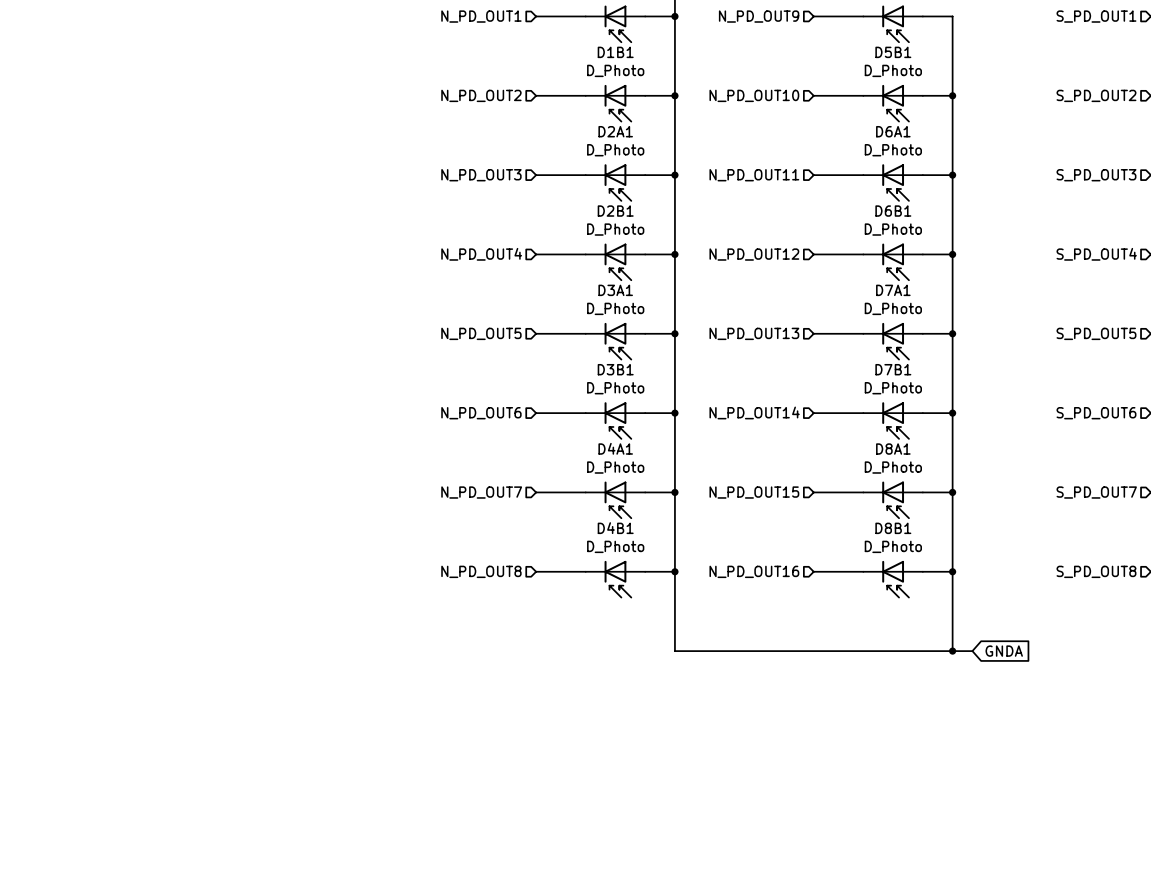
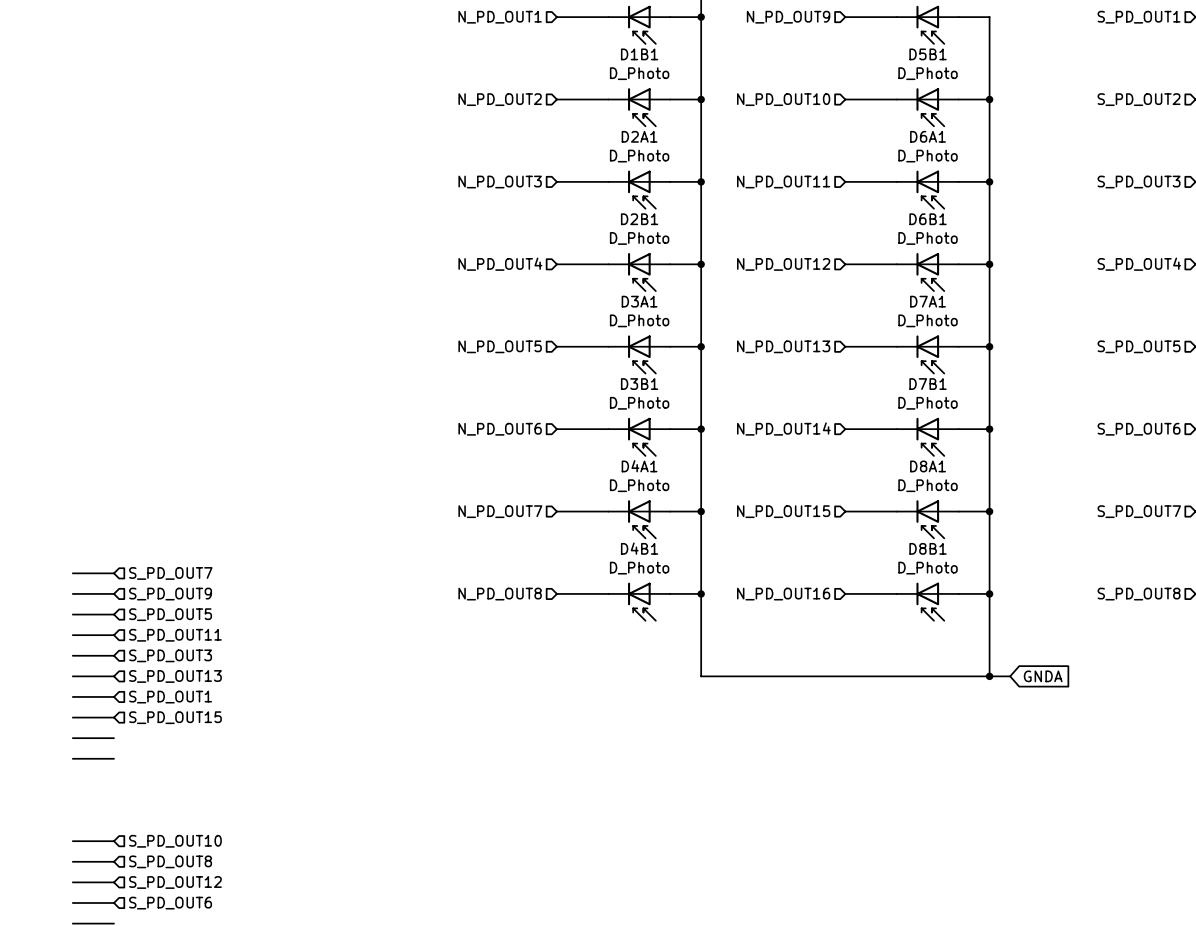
wire: none -> (72, 573) (113, 573)
hierarchical label: none -> S_PD_OUT7 (170, 573)
wire: none -> (72, 593) (113, 593)
hierarchical label: none -> S_PD_OUT9 (170, 594)
wire: none -> (72, 614) (113, 614)
hierarchical label: none -> S_PD_OUT5 (170, 614)
wire: none -> (72, 635) (113, 635)
hierarchical label: none -> S_PD_OUT11 (175, 635)
wire: none -> (72, 655) (113, 655)
hierarchical label: none -> S_PD_OUT3 (170, 655)
wire: none -> (72, 676) (113, 676)
hierarchical label: none -> S_PD_OUT13 (175, 676)
wire: none -> (72, 696) (113, 696)
hierarchical label: none -> S_PD_OUT1 (170, 697)
wire: none -> (72, 717) (113, 717)
hierarchical label: none -> S_PD_OUT15 (175, 717)
wire: none -> (72, 738) (113, 738)
wire: none -> (72, 758) (113, 758)
wire: none -> (72, 841) (113, 841)
hierarchical label: none -> S_PD_OUT10 (175, 841)
wire: none -> (72, 861) (113, 861)
hierarchical label: none -> S_PD_OUT8 (170, 861)
wire: none -> (72, 882) (113, 882)
hierarchical label: none -> S_PD_OUT12 (175, 882)
wire: none -> (72, 902) (113, 902)
hierarchical label: none -> S_PD_OUT6 (170, 903)
wire: none -> (72, 923) (113, 923)

